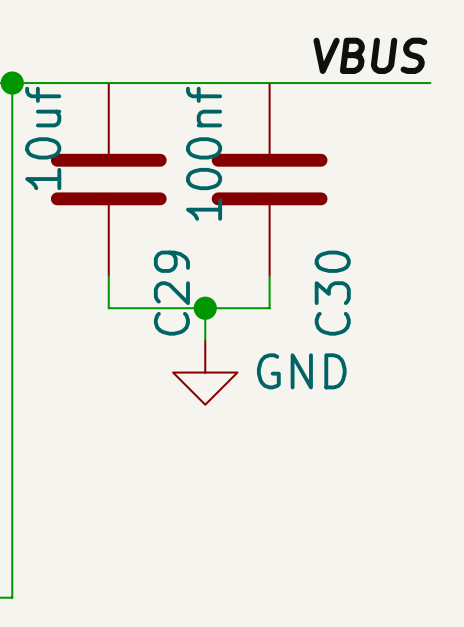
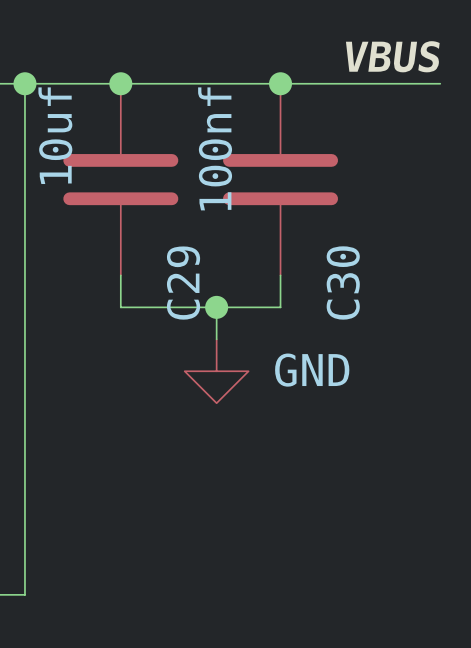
junction: none -> (120, 83)
junction: none -> (280, 83)

